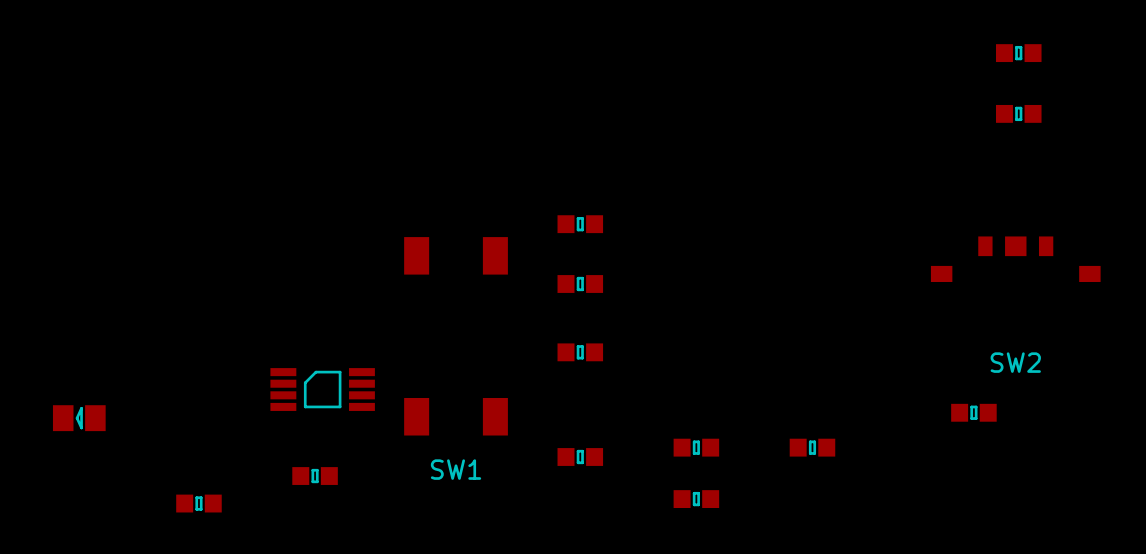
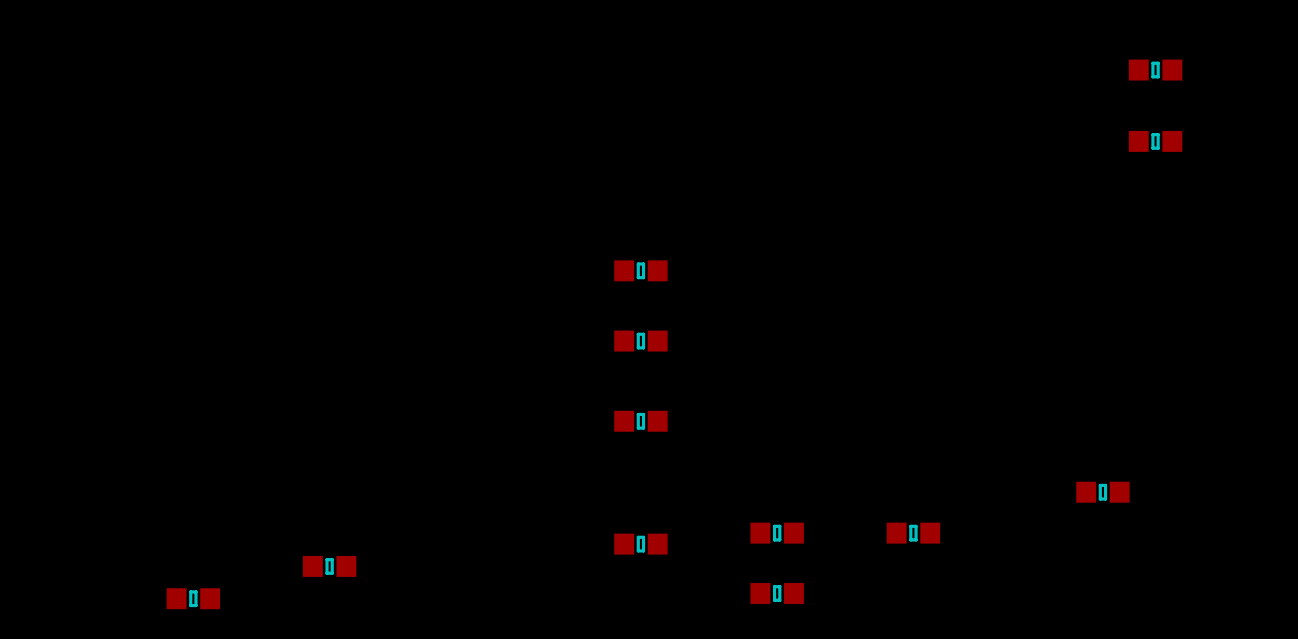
SW2: (1015, 259) -> none
SW1: (456, 336) -> none
part: (322, 389) -> none
part: (79, 418) -> none

